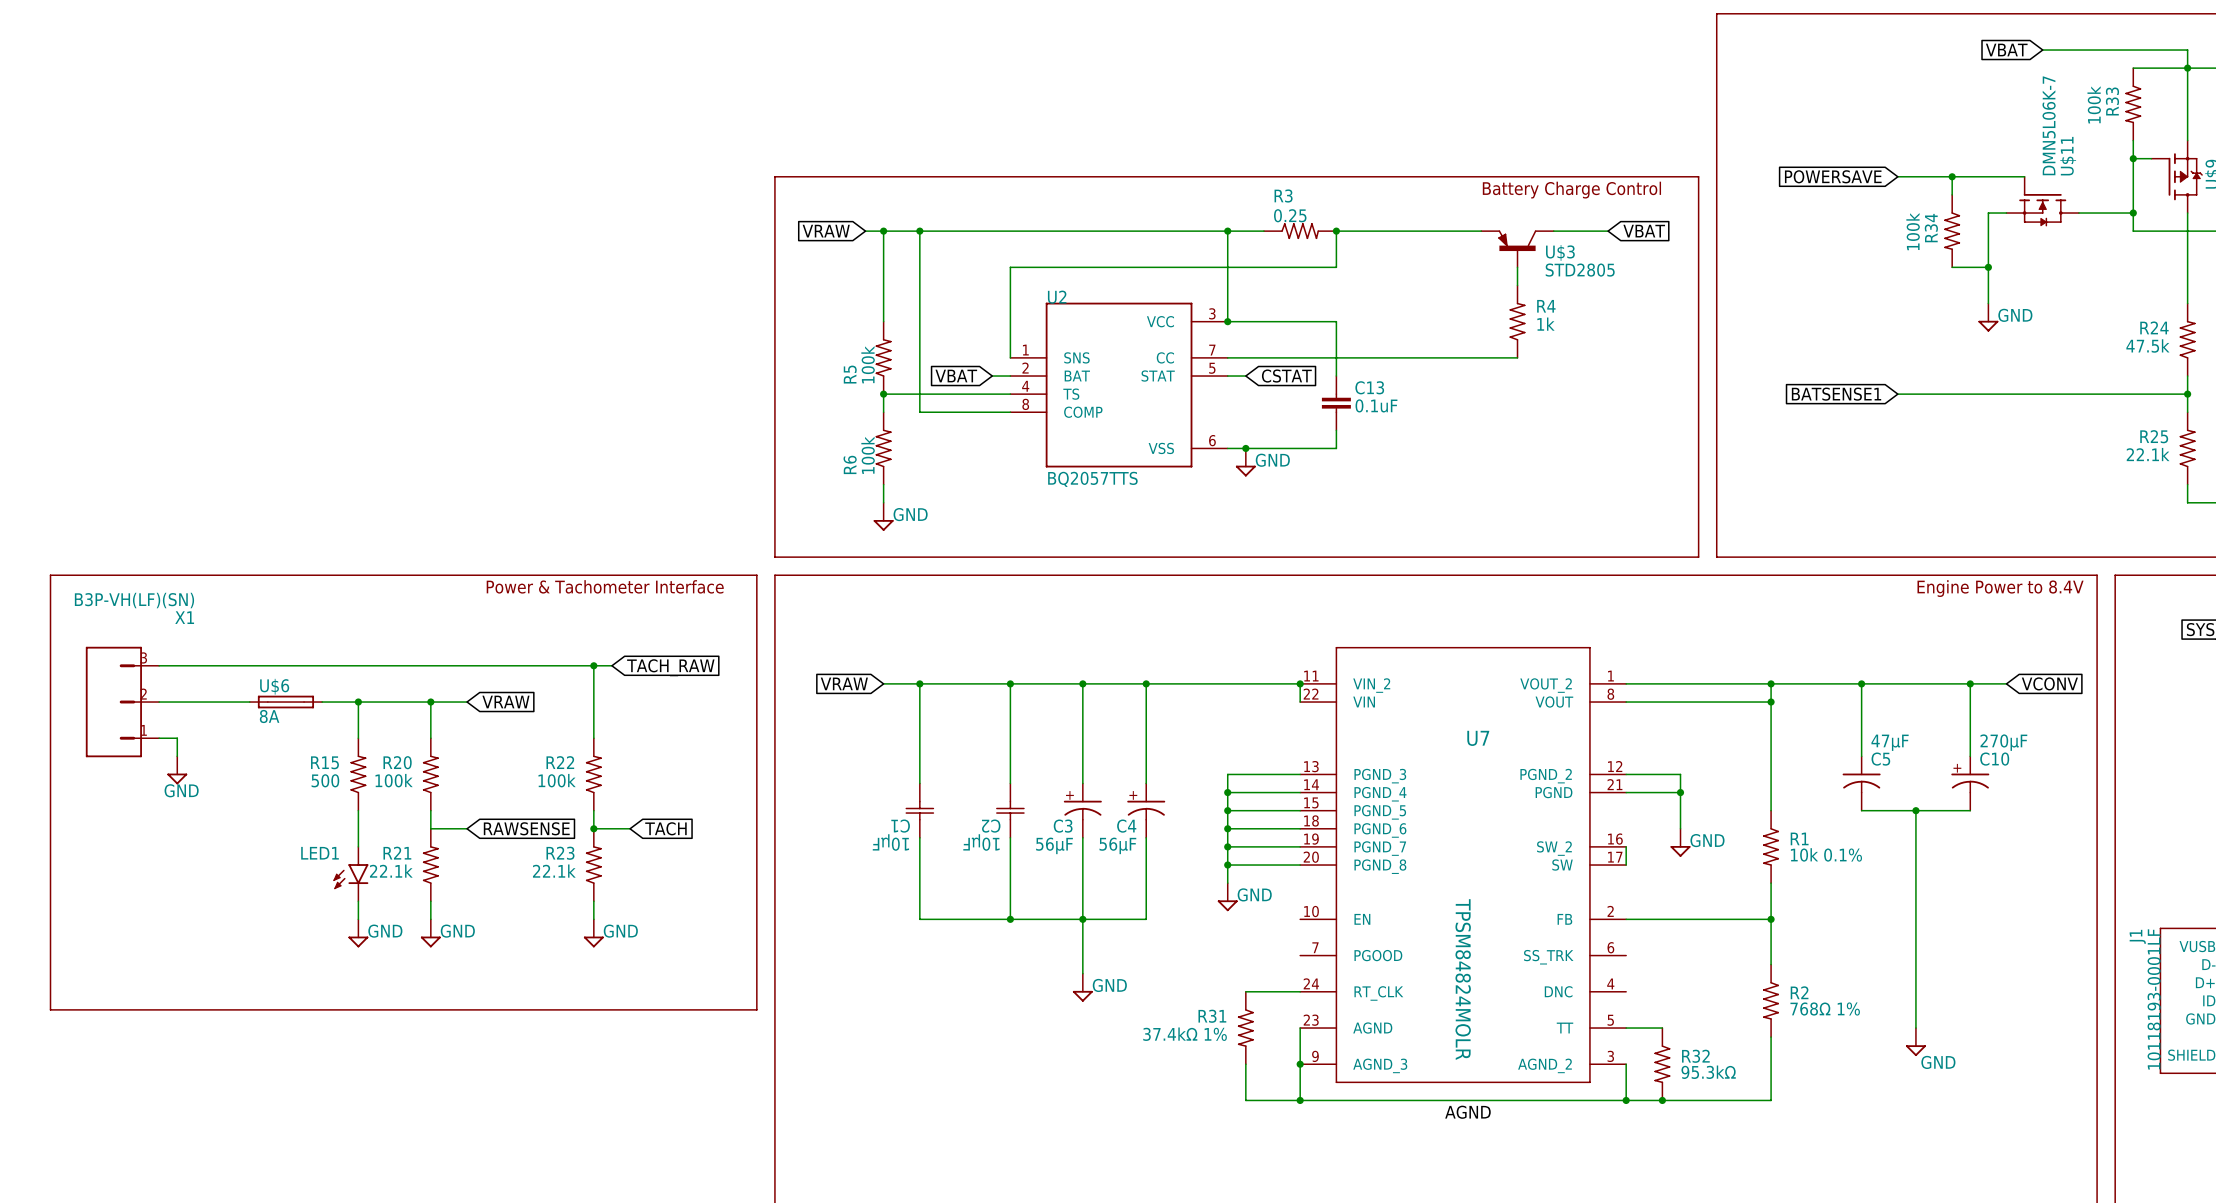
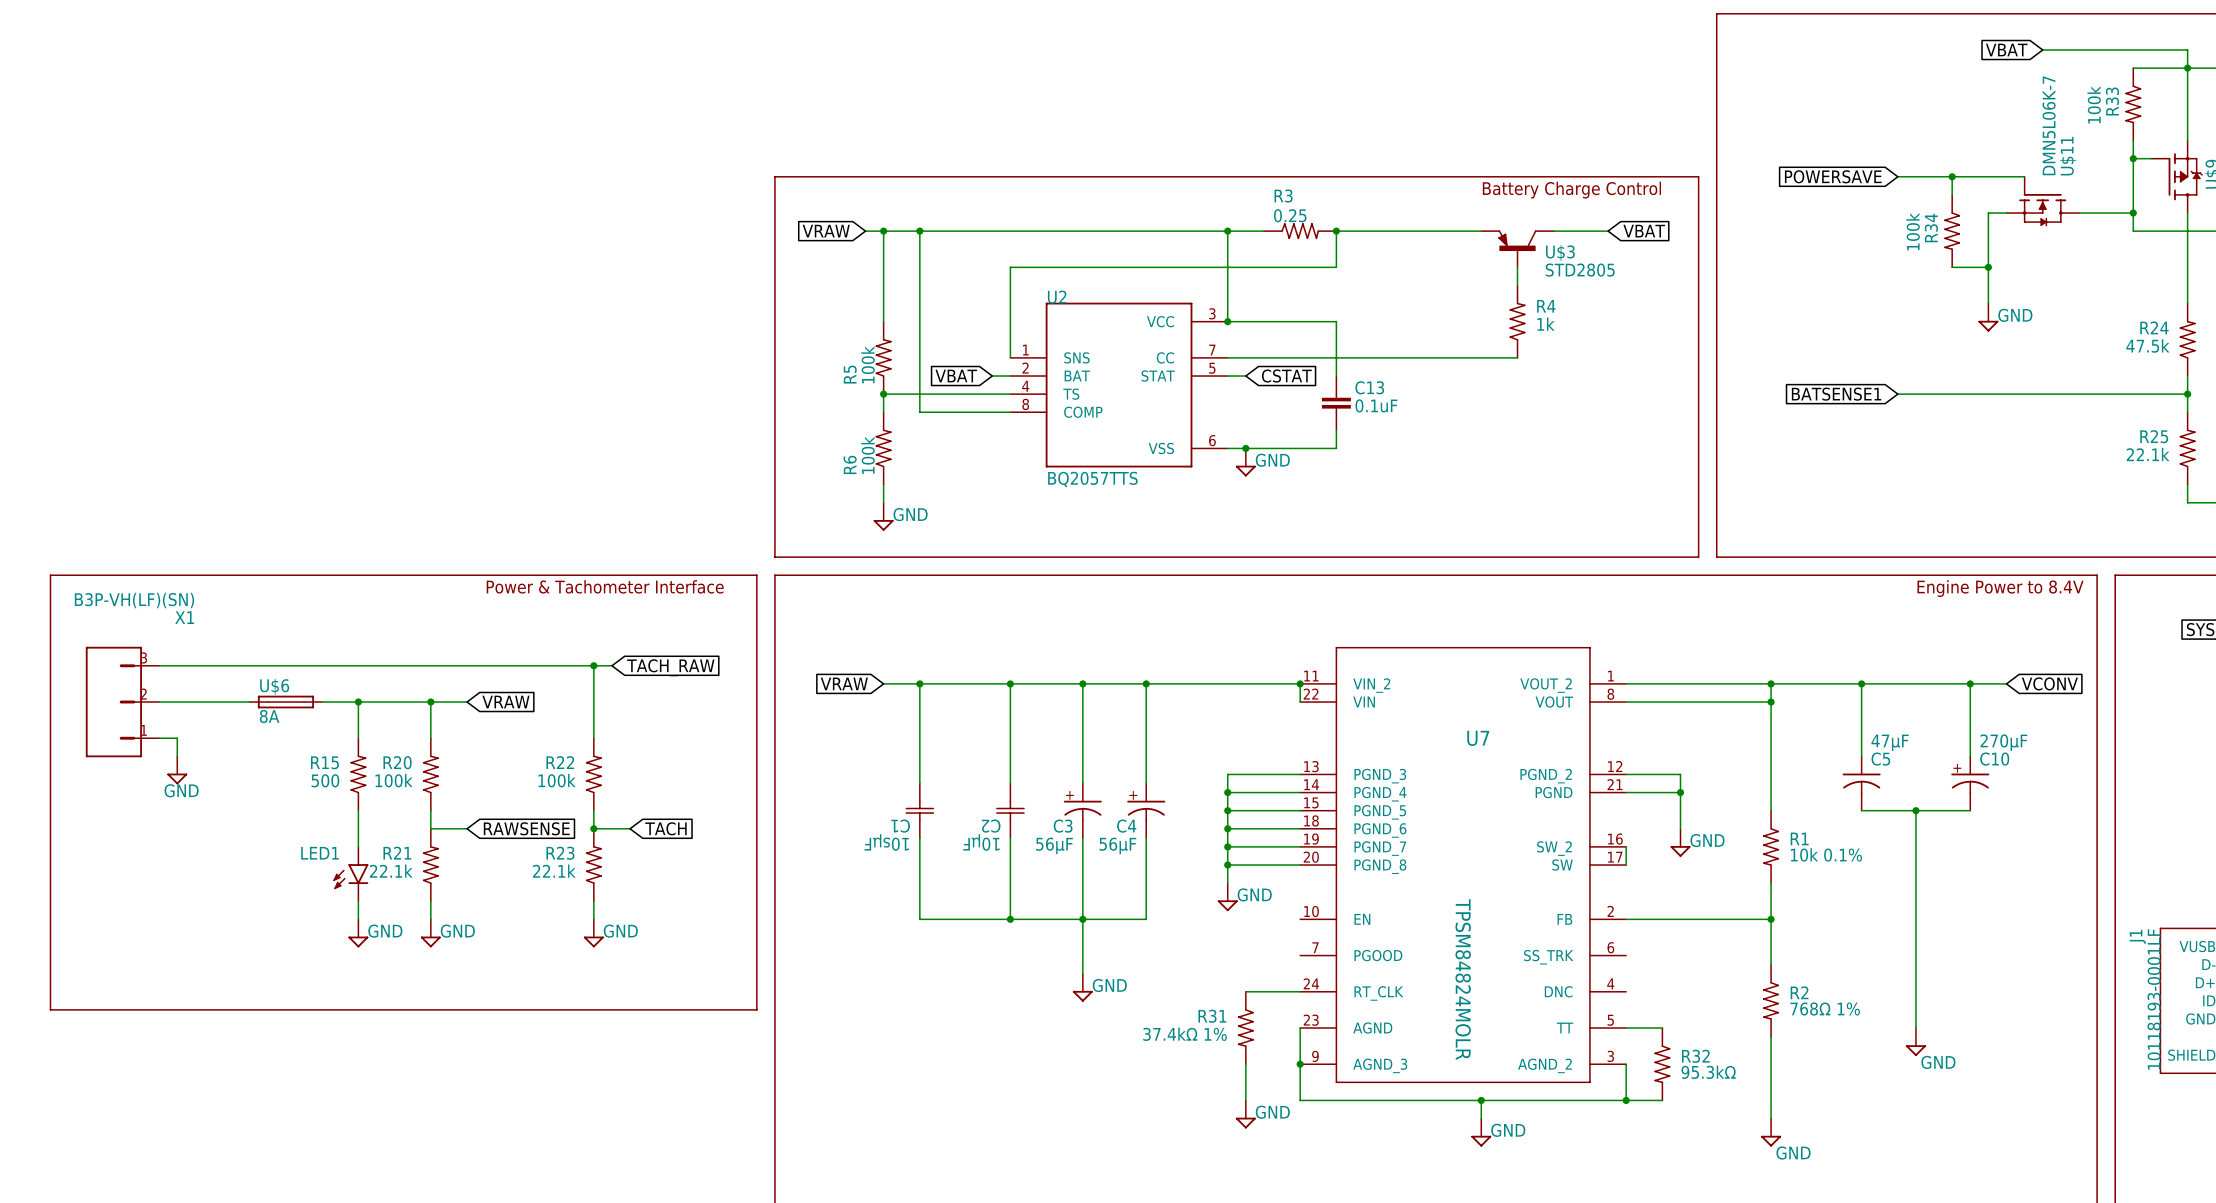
C1 value: 10µF (890, 842) -> 10sµF (886, 842)
wire: (1245, 1100) (1300, 1100) -> none
junction: (1300, 1100) -> none
wire: none -> (1481, 1100) (1481, 1118)
junction: none -> (1481, 1100)
wire: (1662, 1100) (1771, 1100) -> (1771, 1118) (1771, 1100)
junction: (1662, 1100) -> none
label: AGND (1467, 1112) -> none
power symbol: none -> GND (1245, 1114)
power symbol: none -> GND (1481, 1132)
power symbol: none -> GND (1771, 1132)

